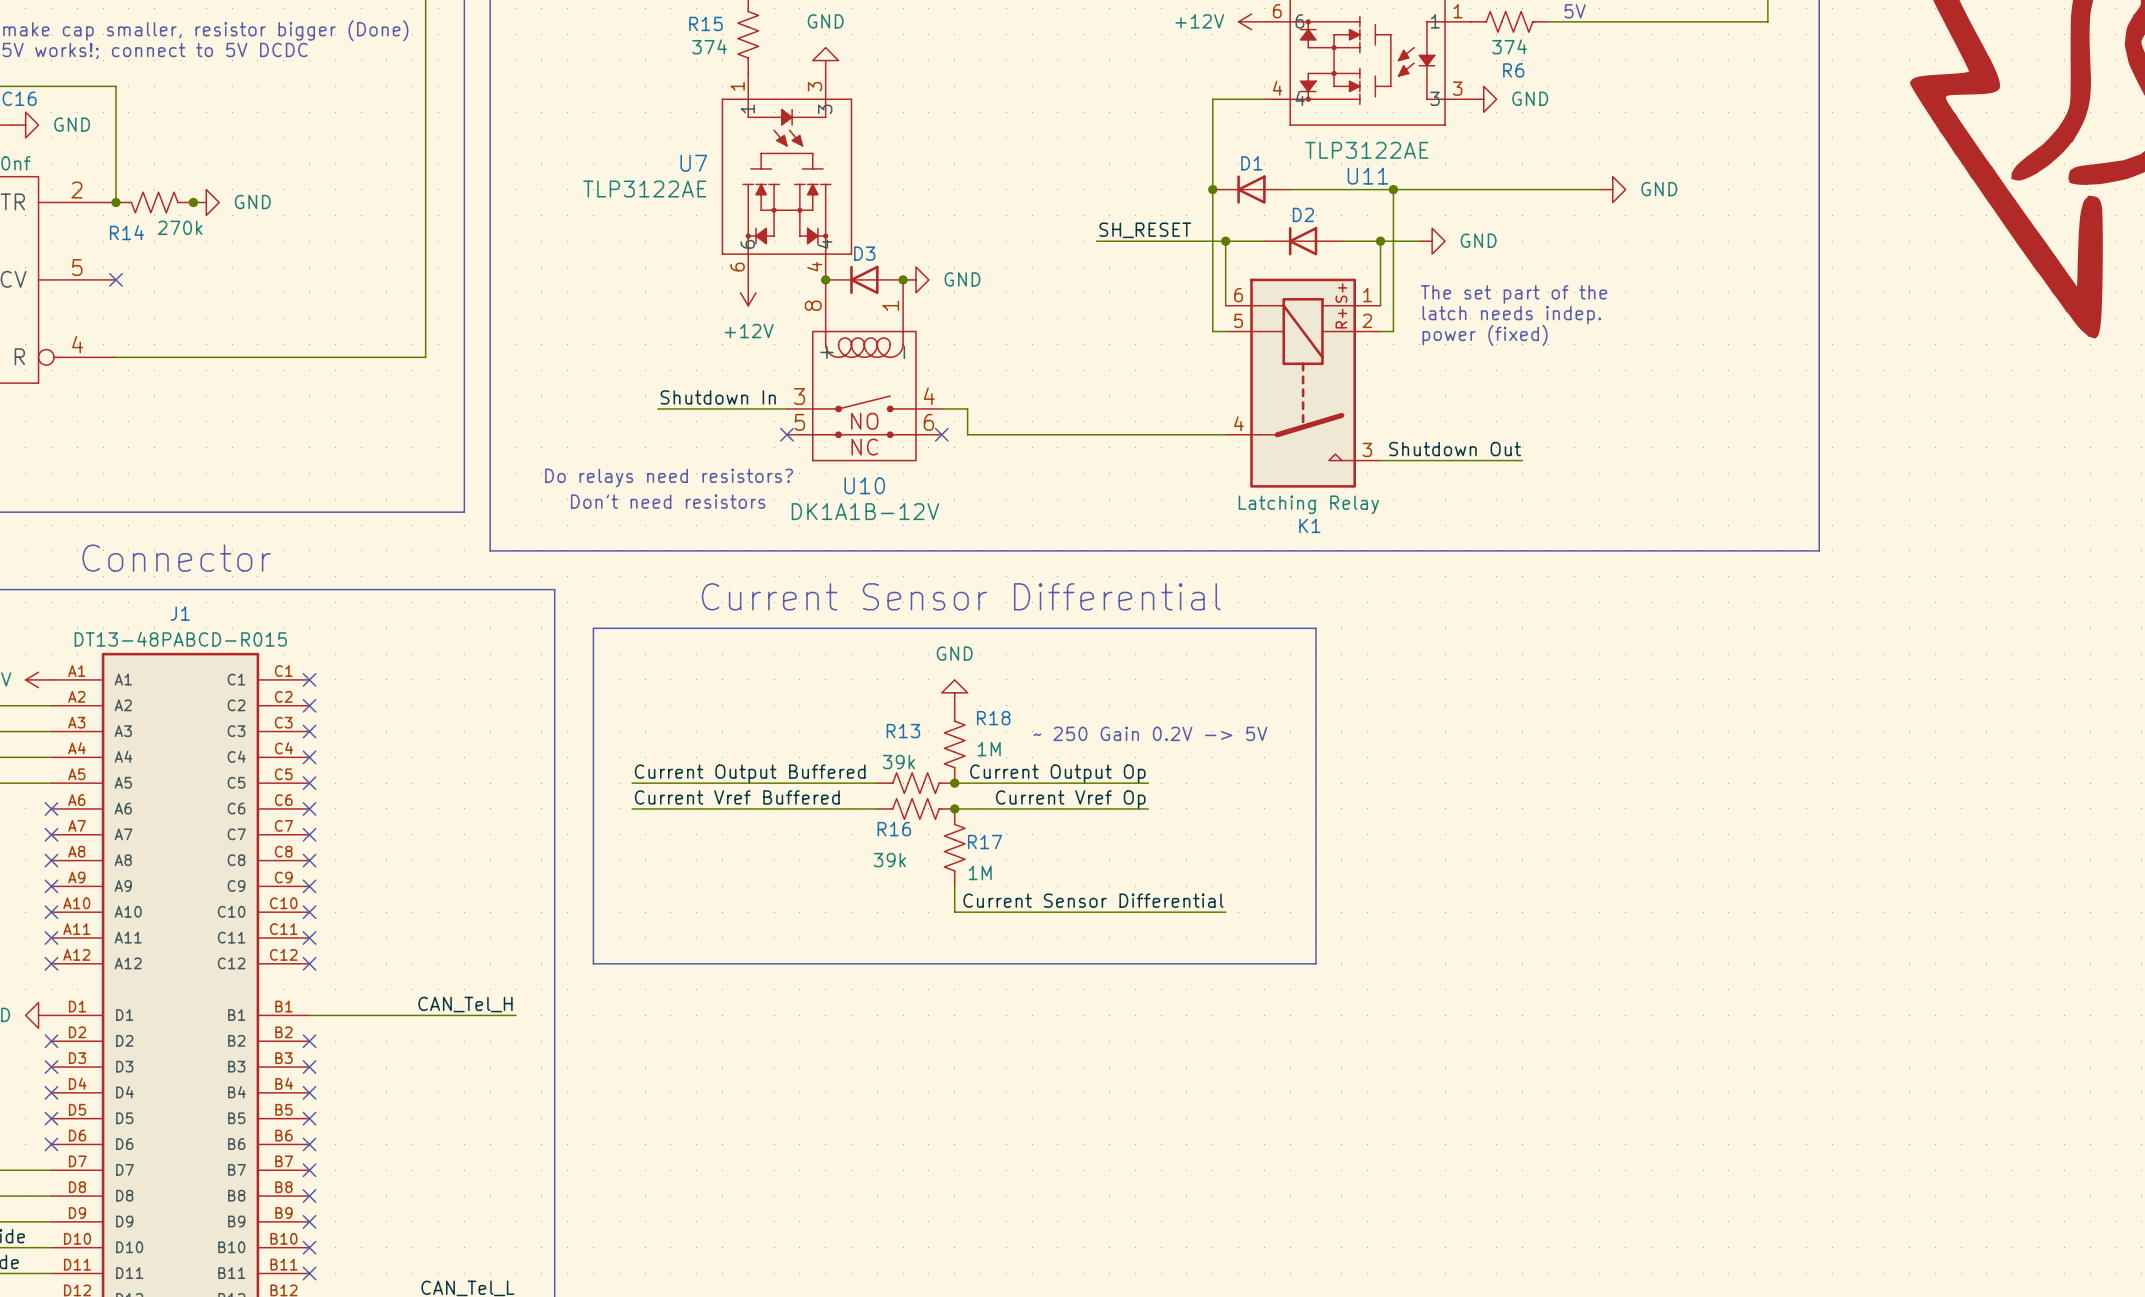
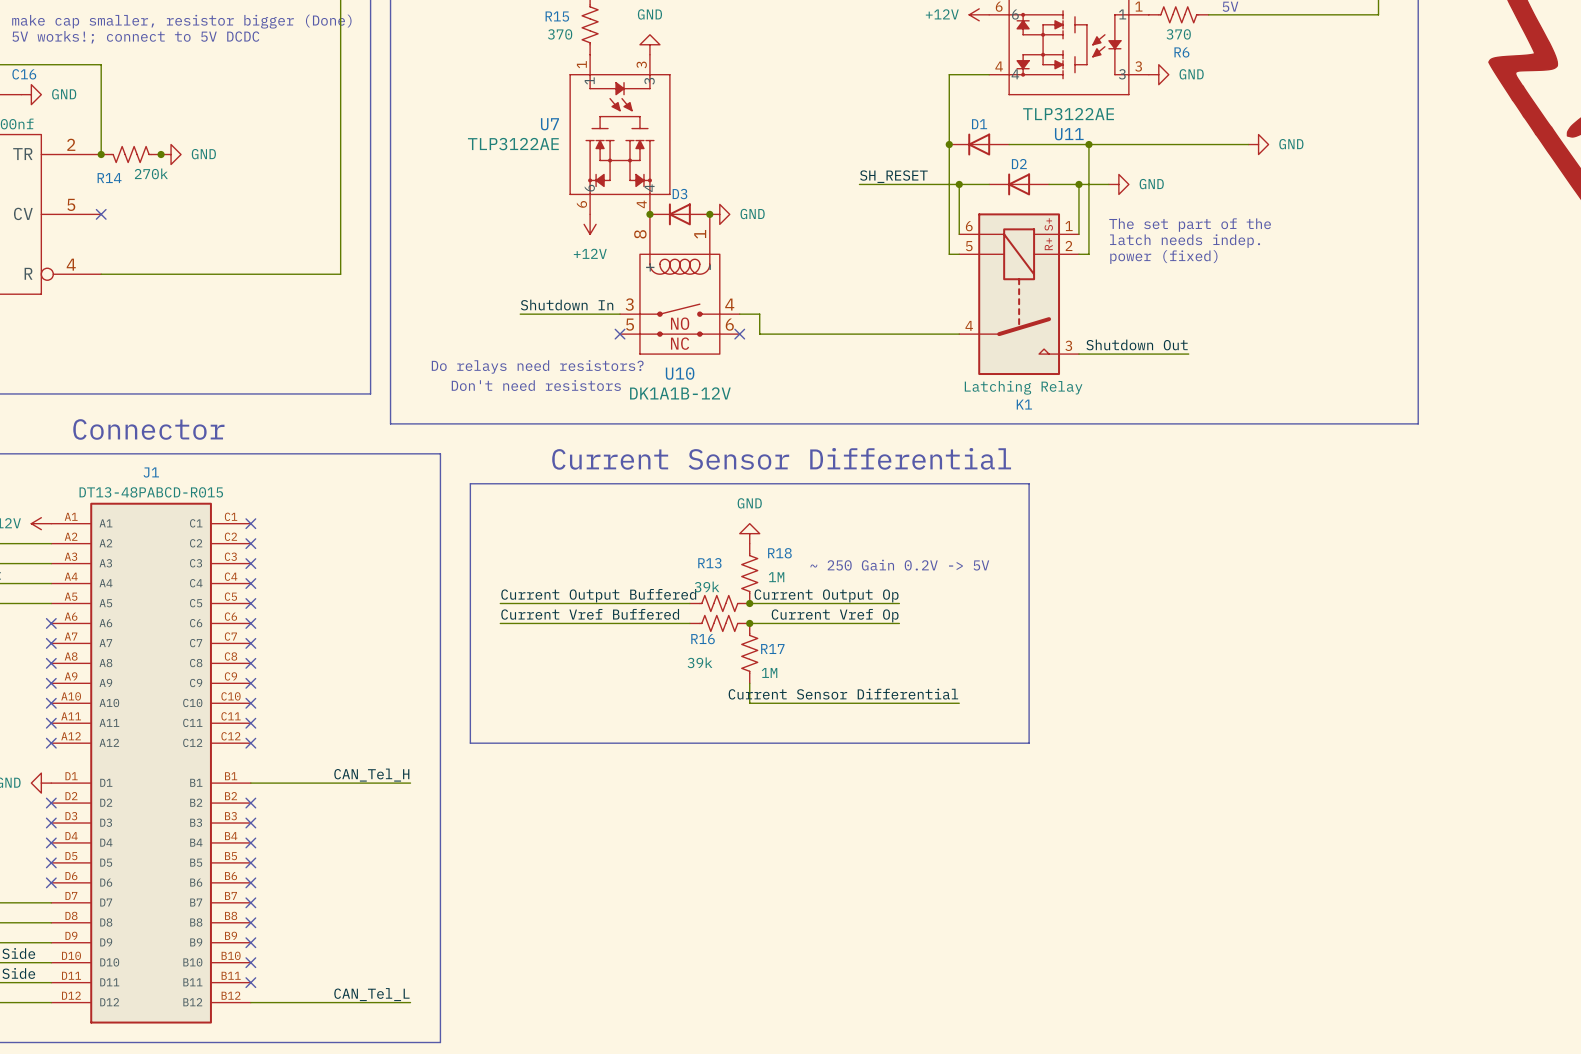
R15 value: 374 (709, 46) -> 370 (560, 34)
R6 value: 374 (1509, 46) -> 370 (1178, 34)

